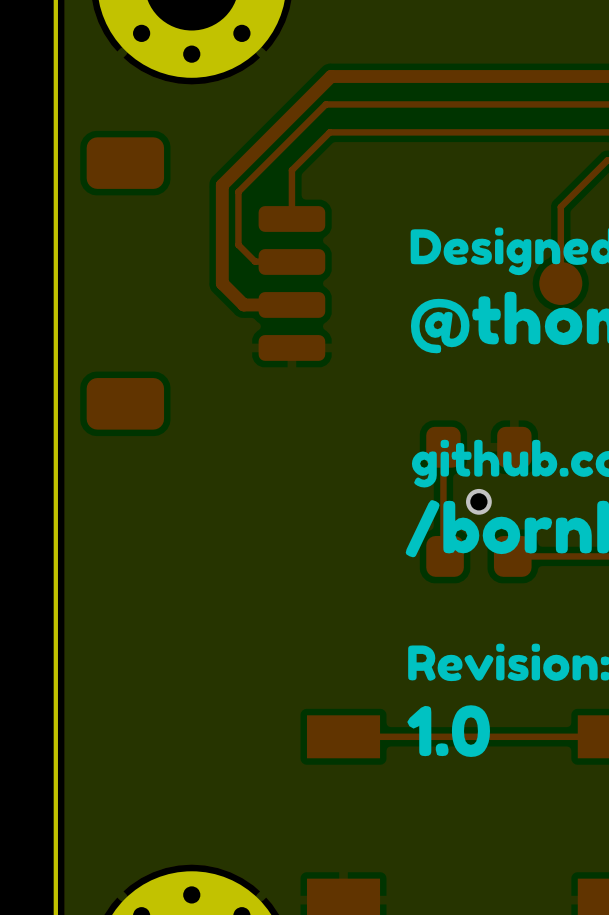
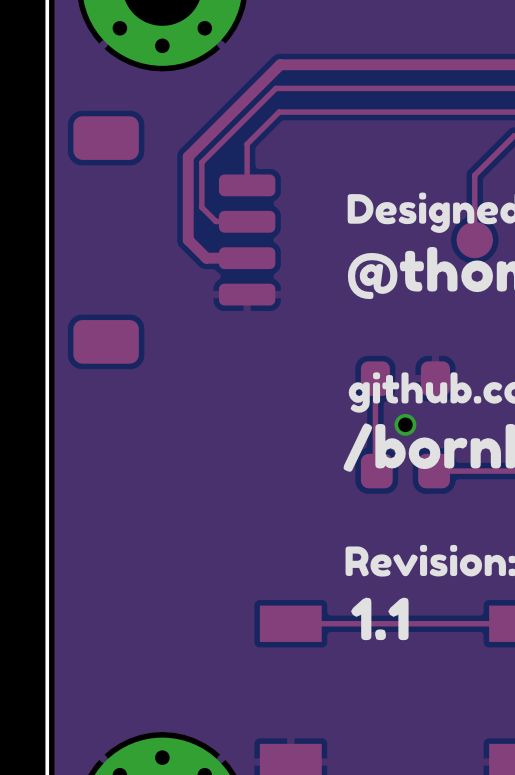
drawing shape: [407, 705, 491, 757] -> [351, 597, 409, 641]

